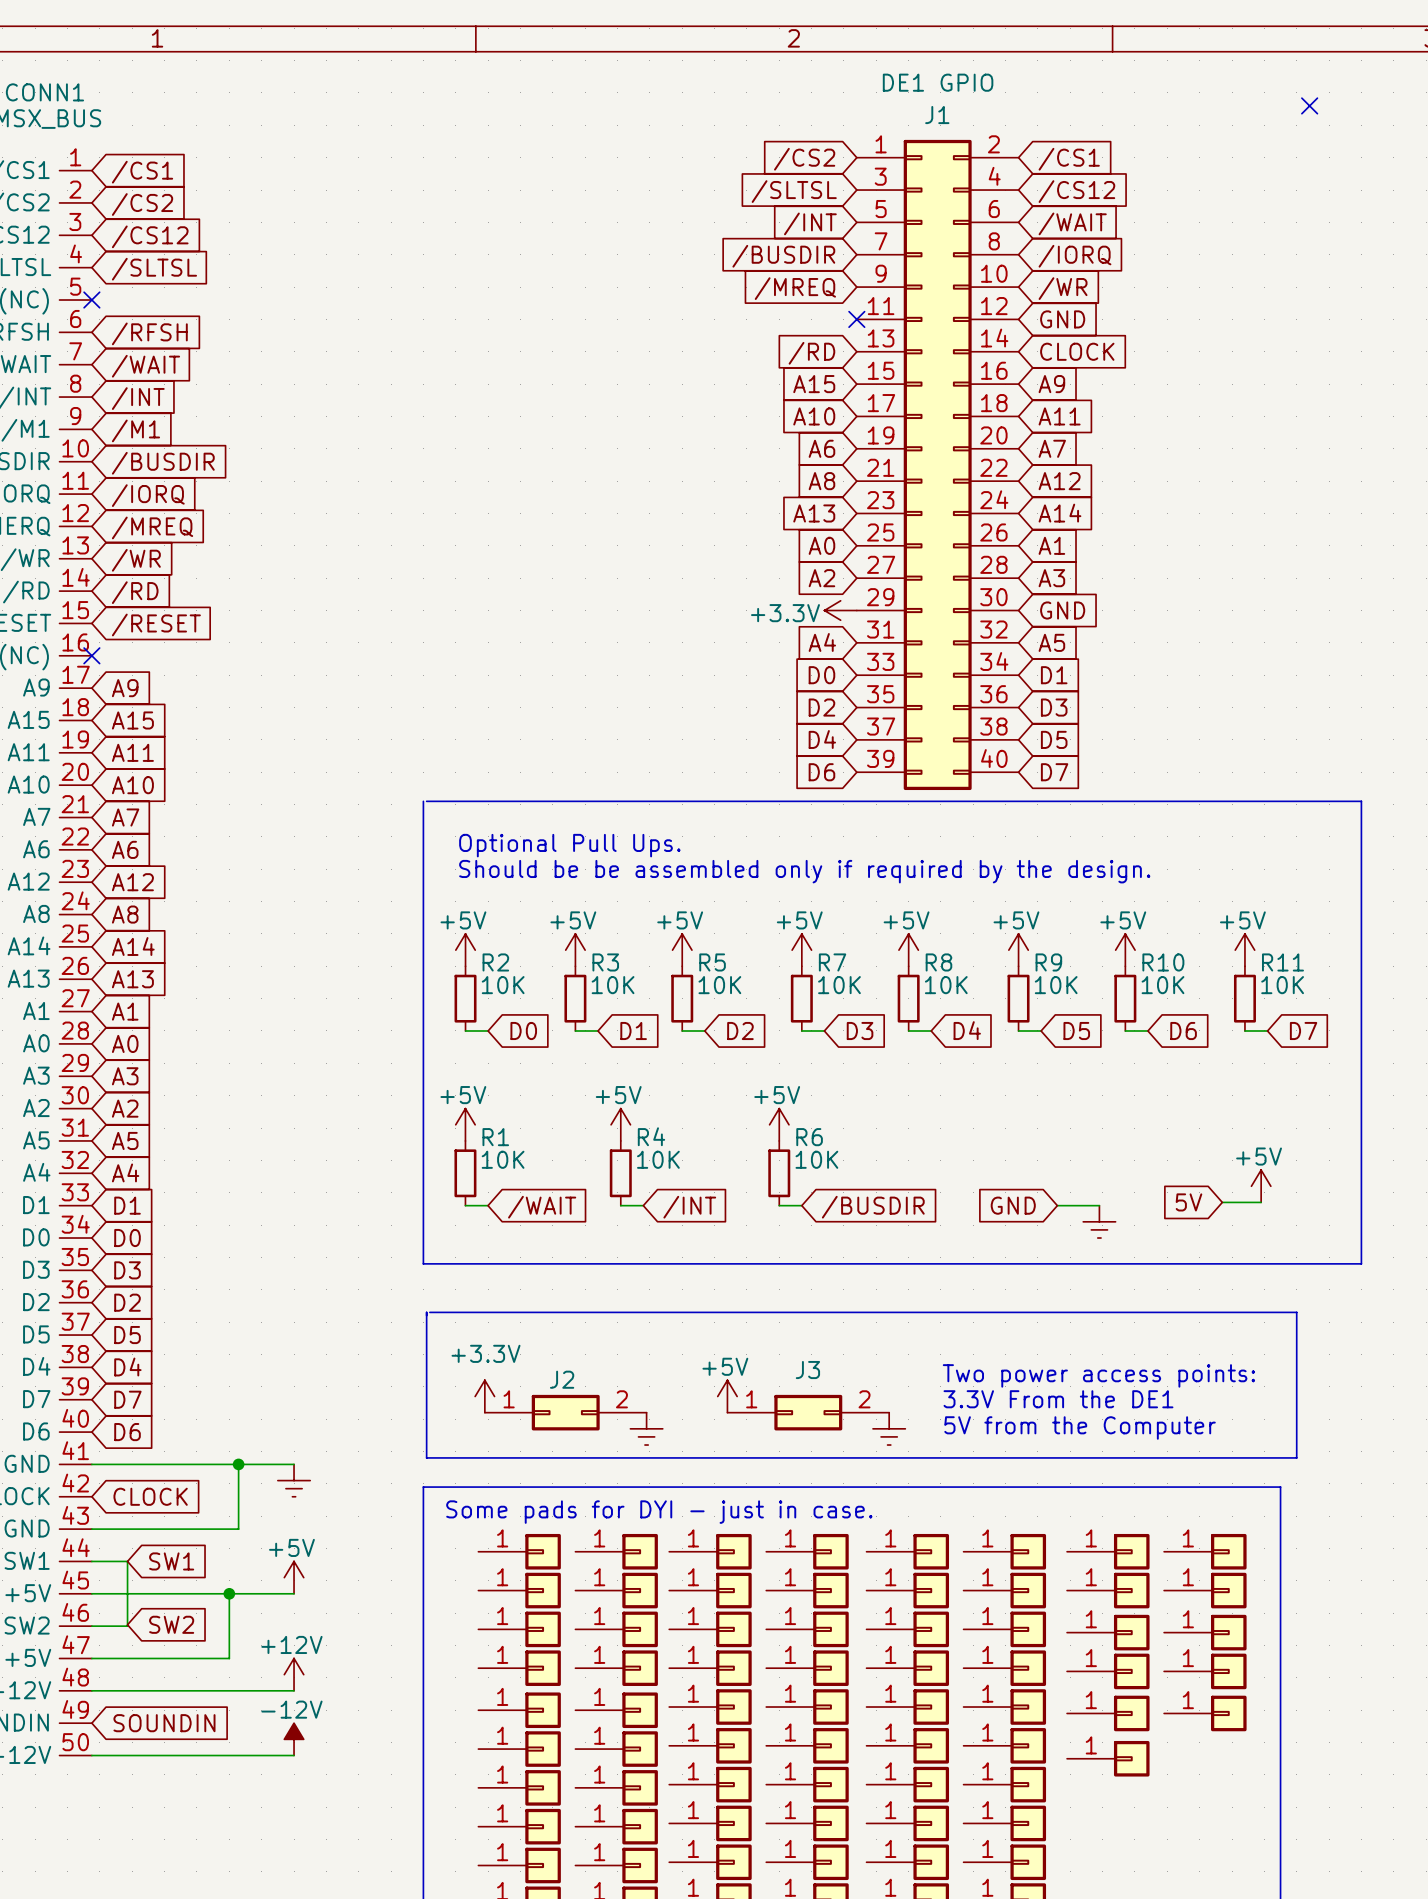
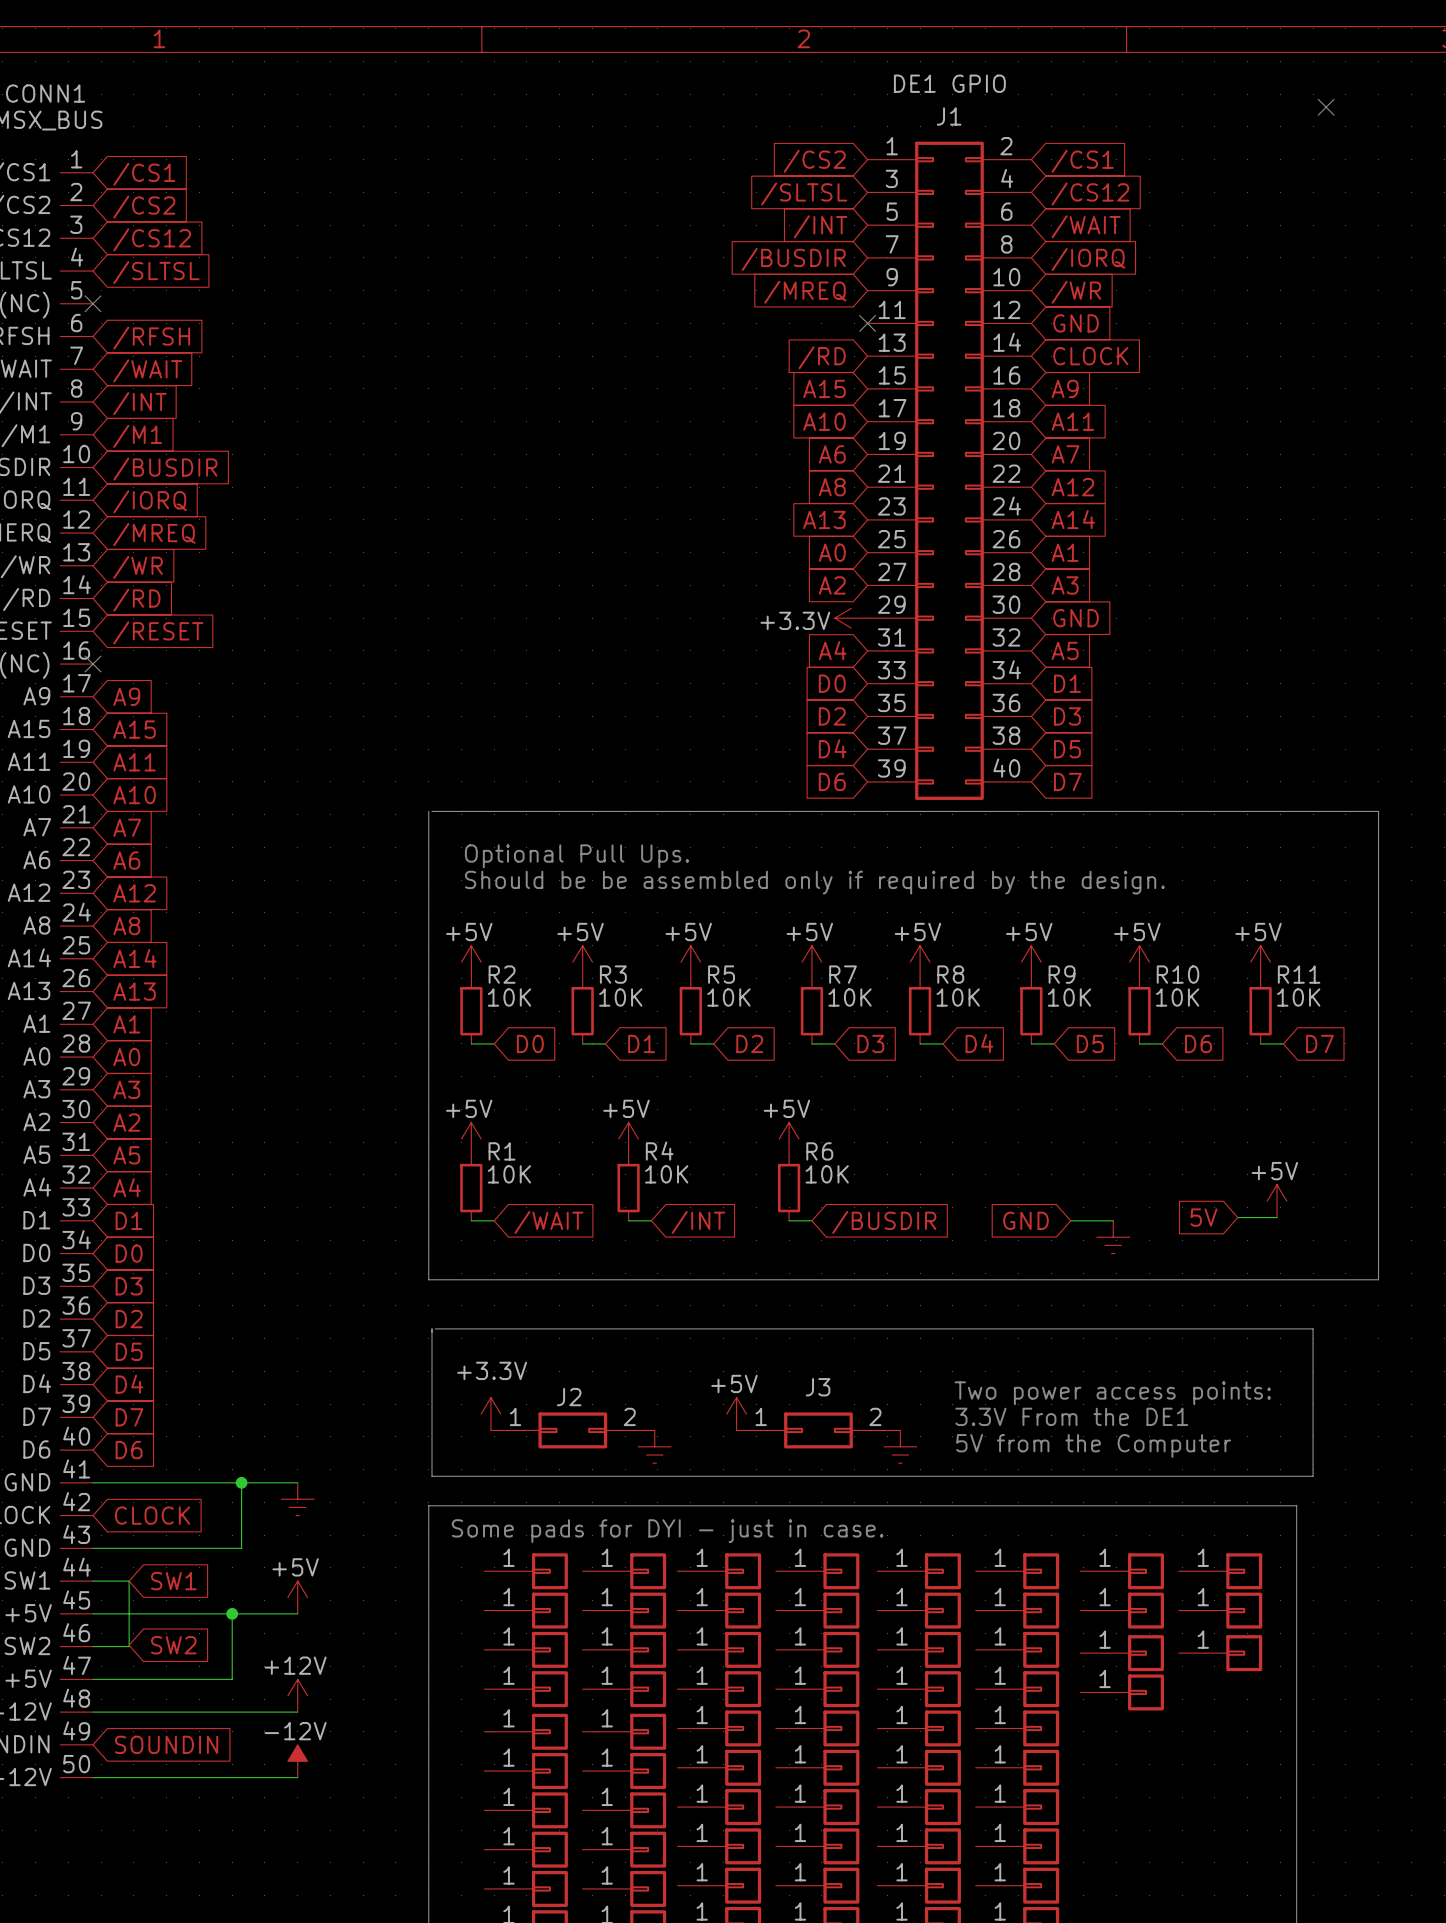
part: (1205, 1671) -> none
part: (1108, 1713) -> none
part: (1205, 1713) -> none
part: (1108, 1758) -> none

